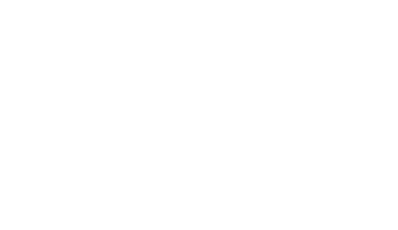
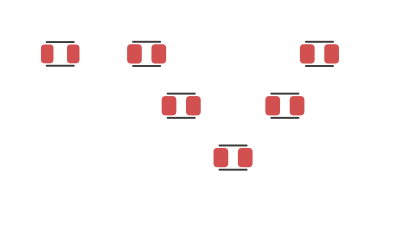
part: none -> (60, 53)
part: none -> (146, 53)
part: none -> (319, 53)
part: none -> (181, 105)
part: none -> (284, 105)
part: none -> (233, 157)

